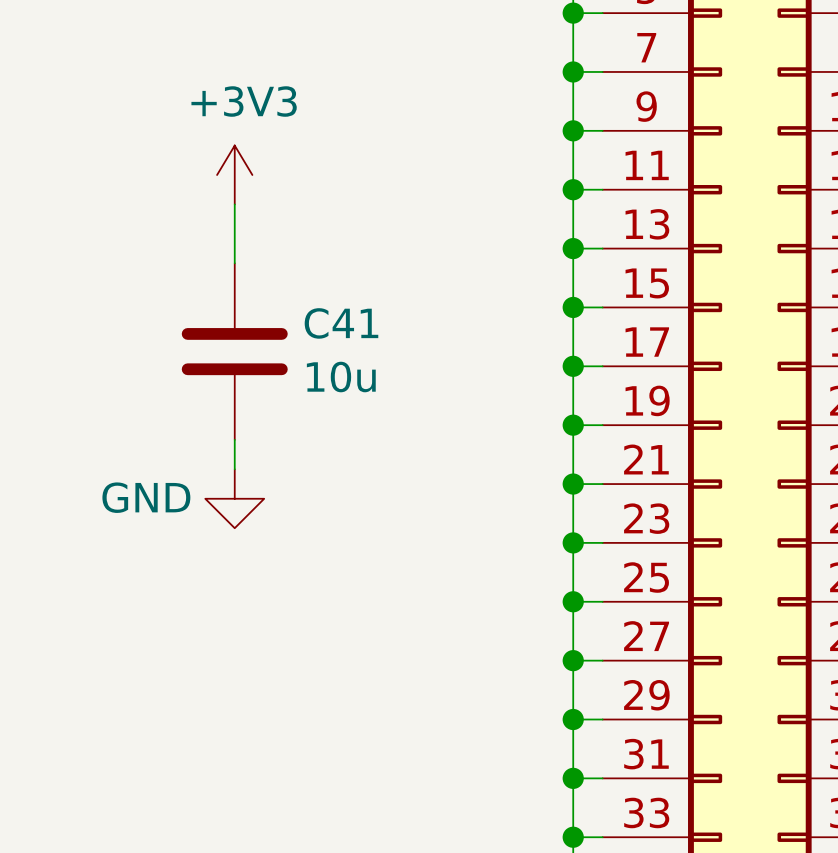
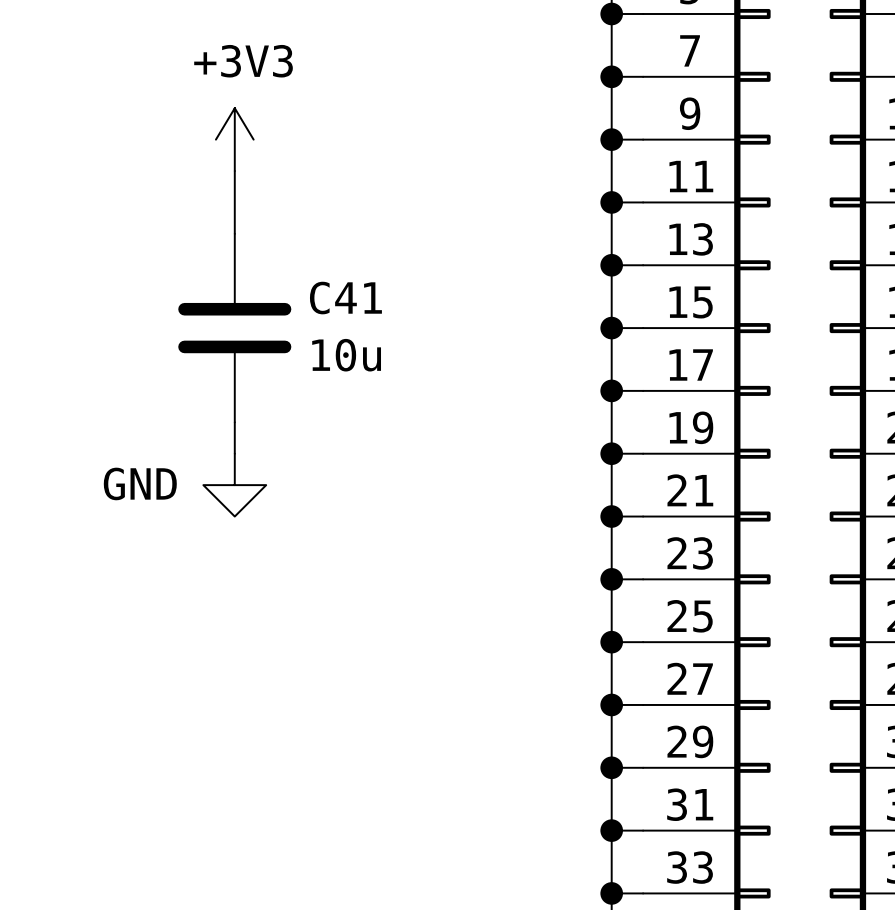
power symbol position: +3V3 (234, 175) -> +3V3 (234, 139)
wire: (234, 204) (234, 263) -> (234, 171) (234, 233)
C41 position: (234, 351) -> (234, 328)
wire: (234, 439) (234, 469) -> (234, 422) (234, 453)
power symbol position: GND (234, 498) -> GND (234, 485)

